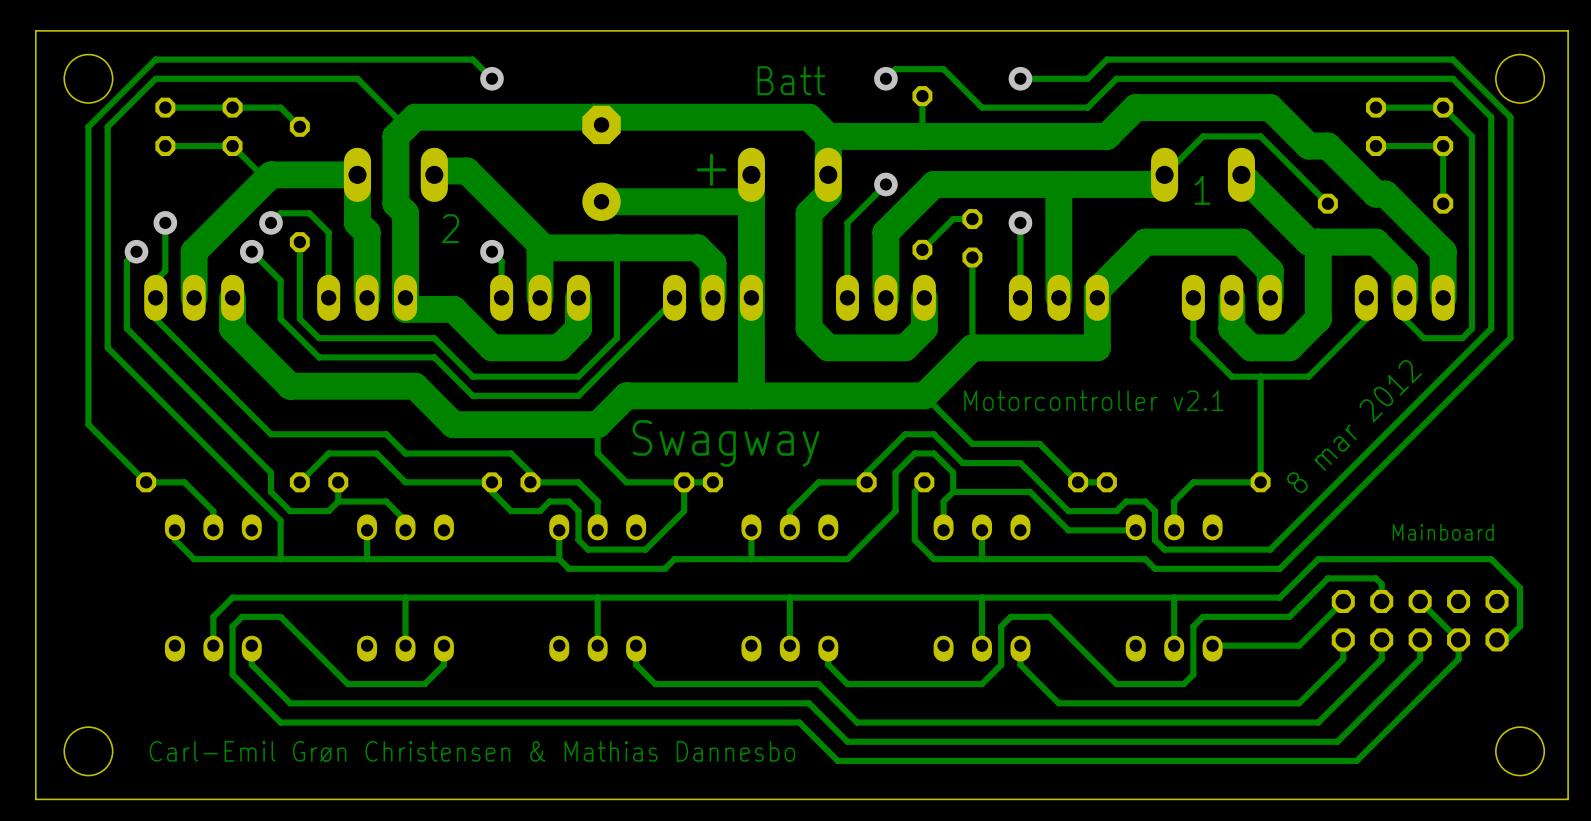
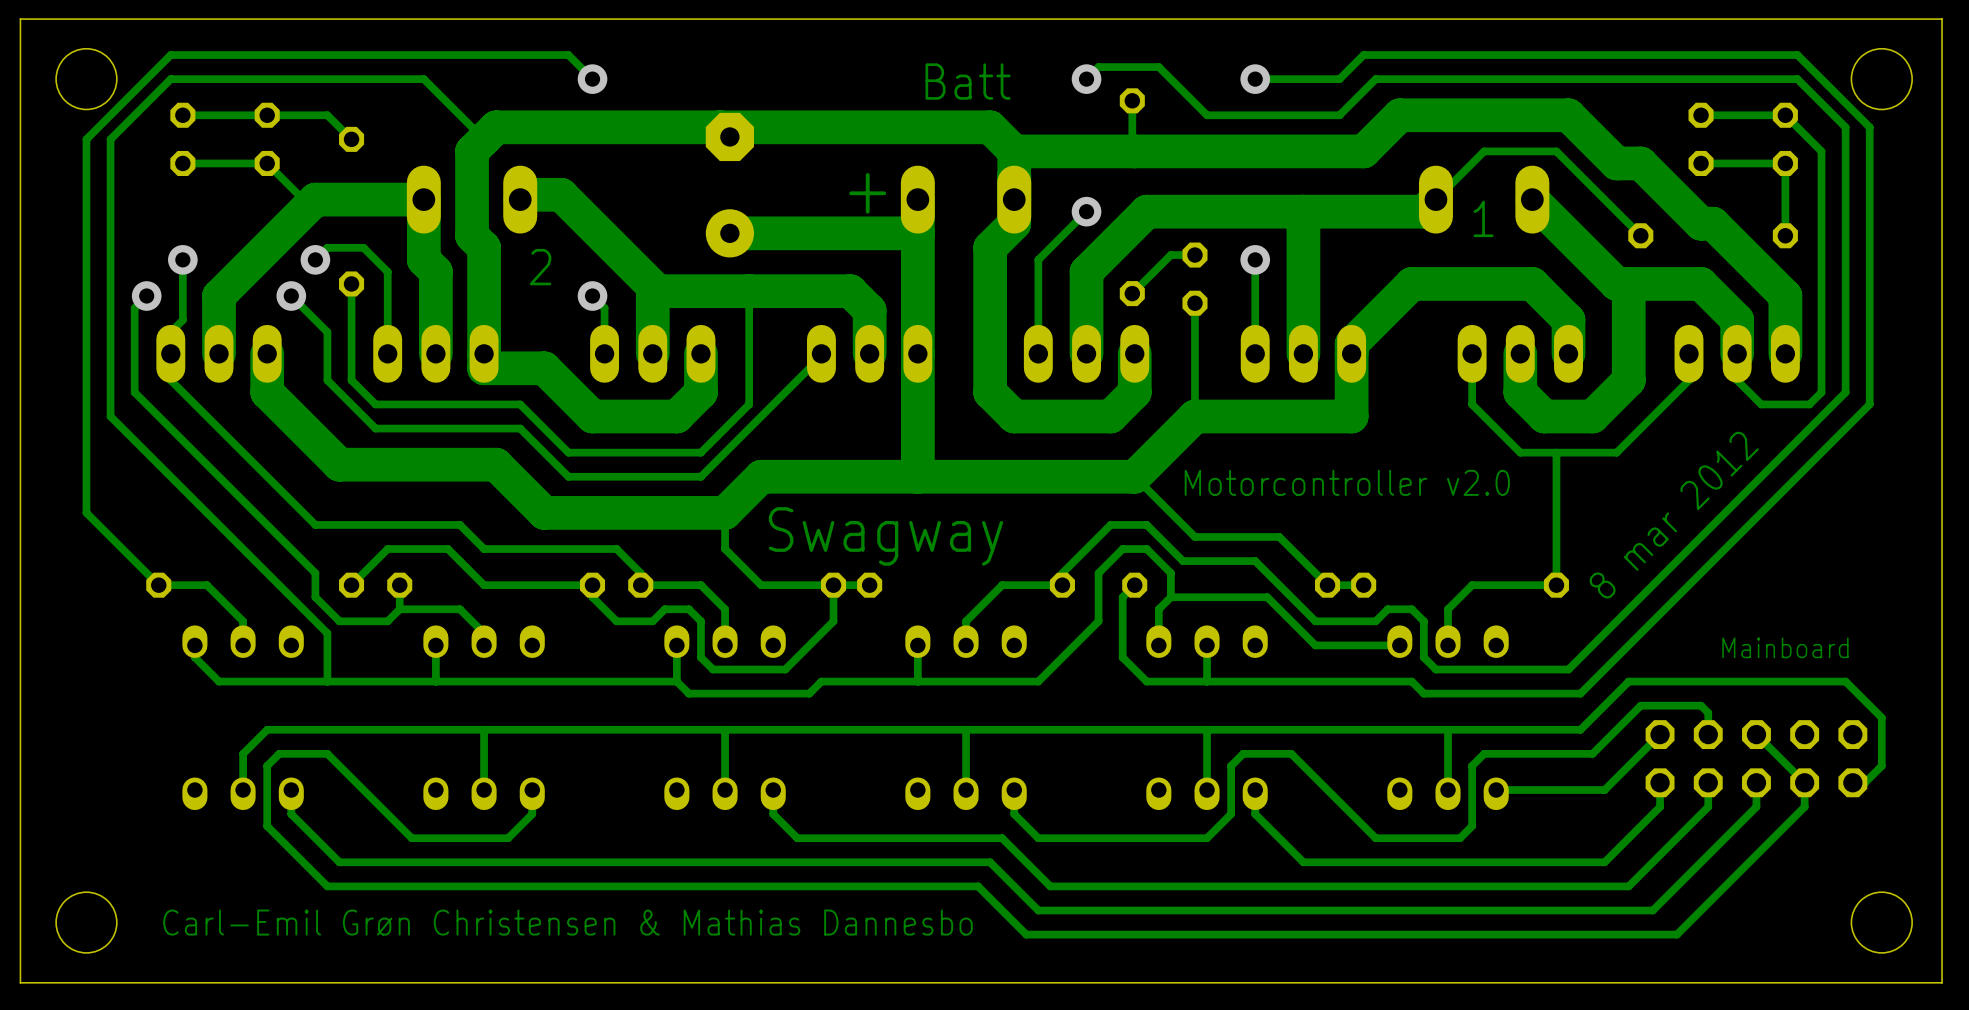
text: Motorcontroller v2.1 (1093, 400) -> Motorcontroller v2.0 (1347, 482)

